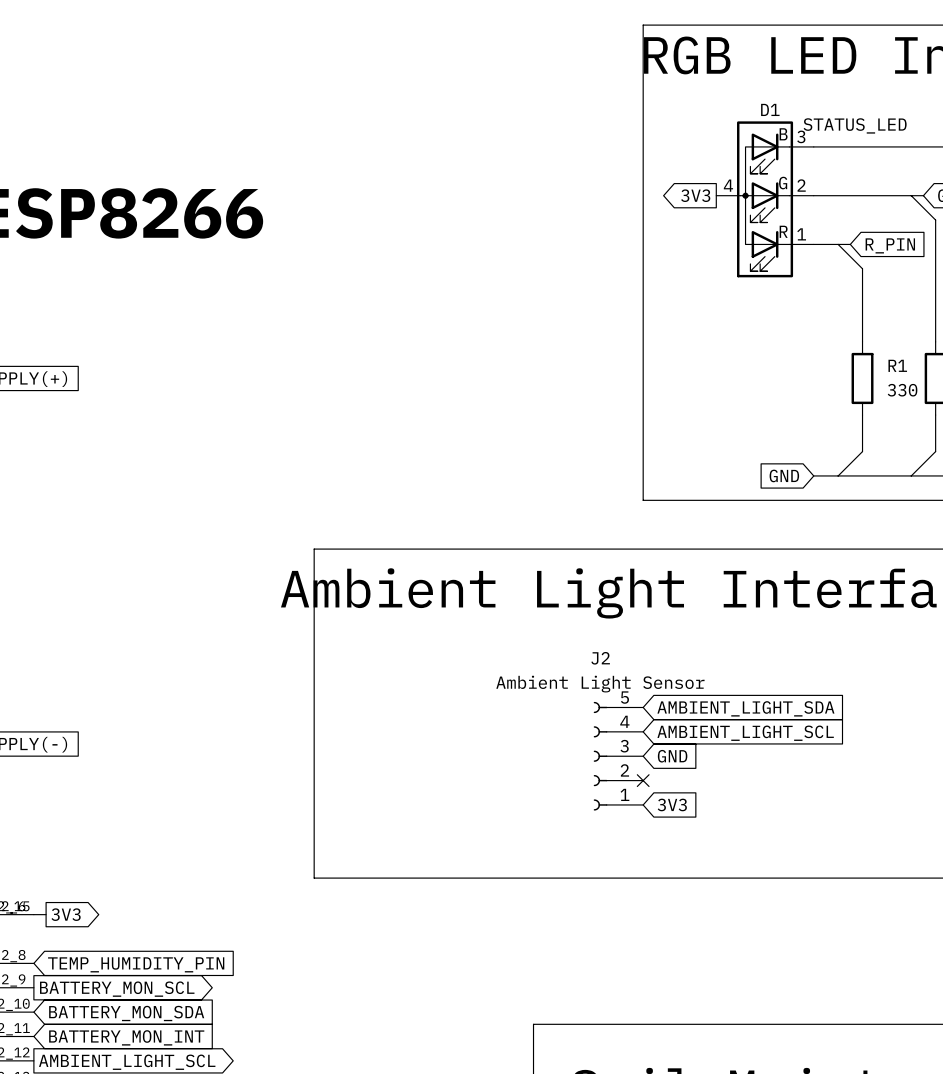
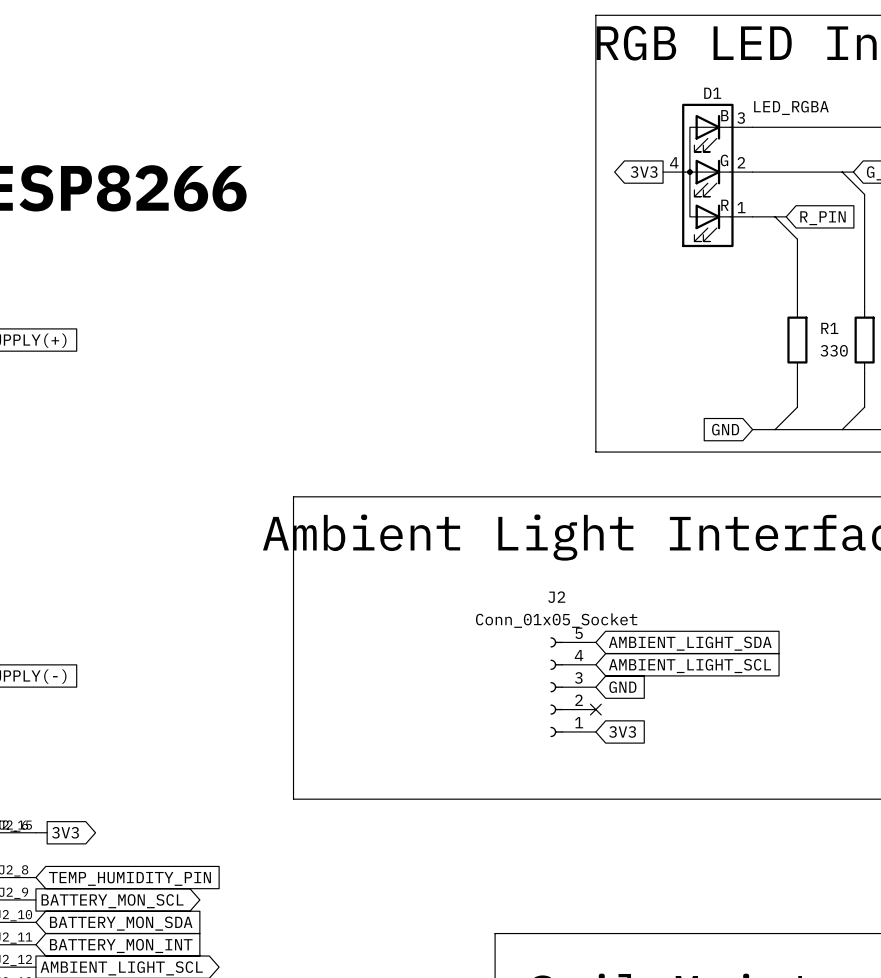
D1 value: STATUS_LED (855, 125) -> LED_RGBA (791, 107)
J2 value: Ambient Light Sensor (600, 684) -> Conn_01x05_Socket (556, 620)

